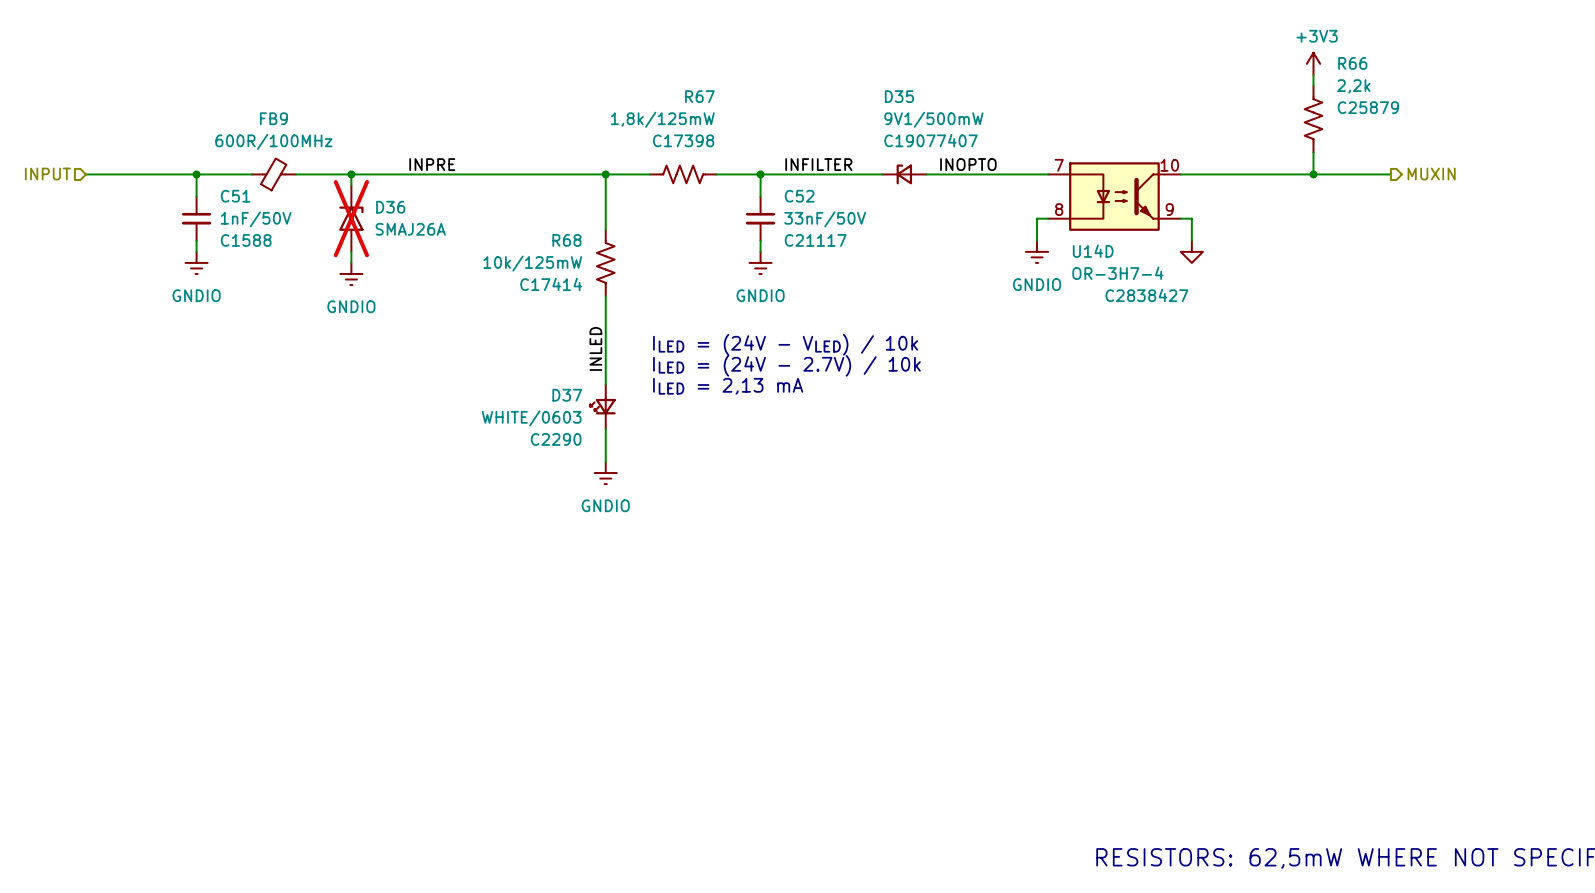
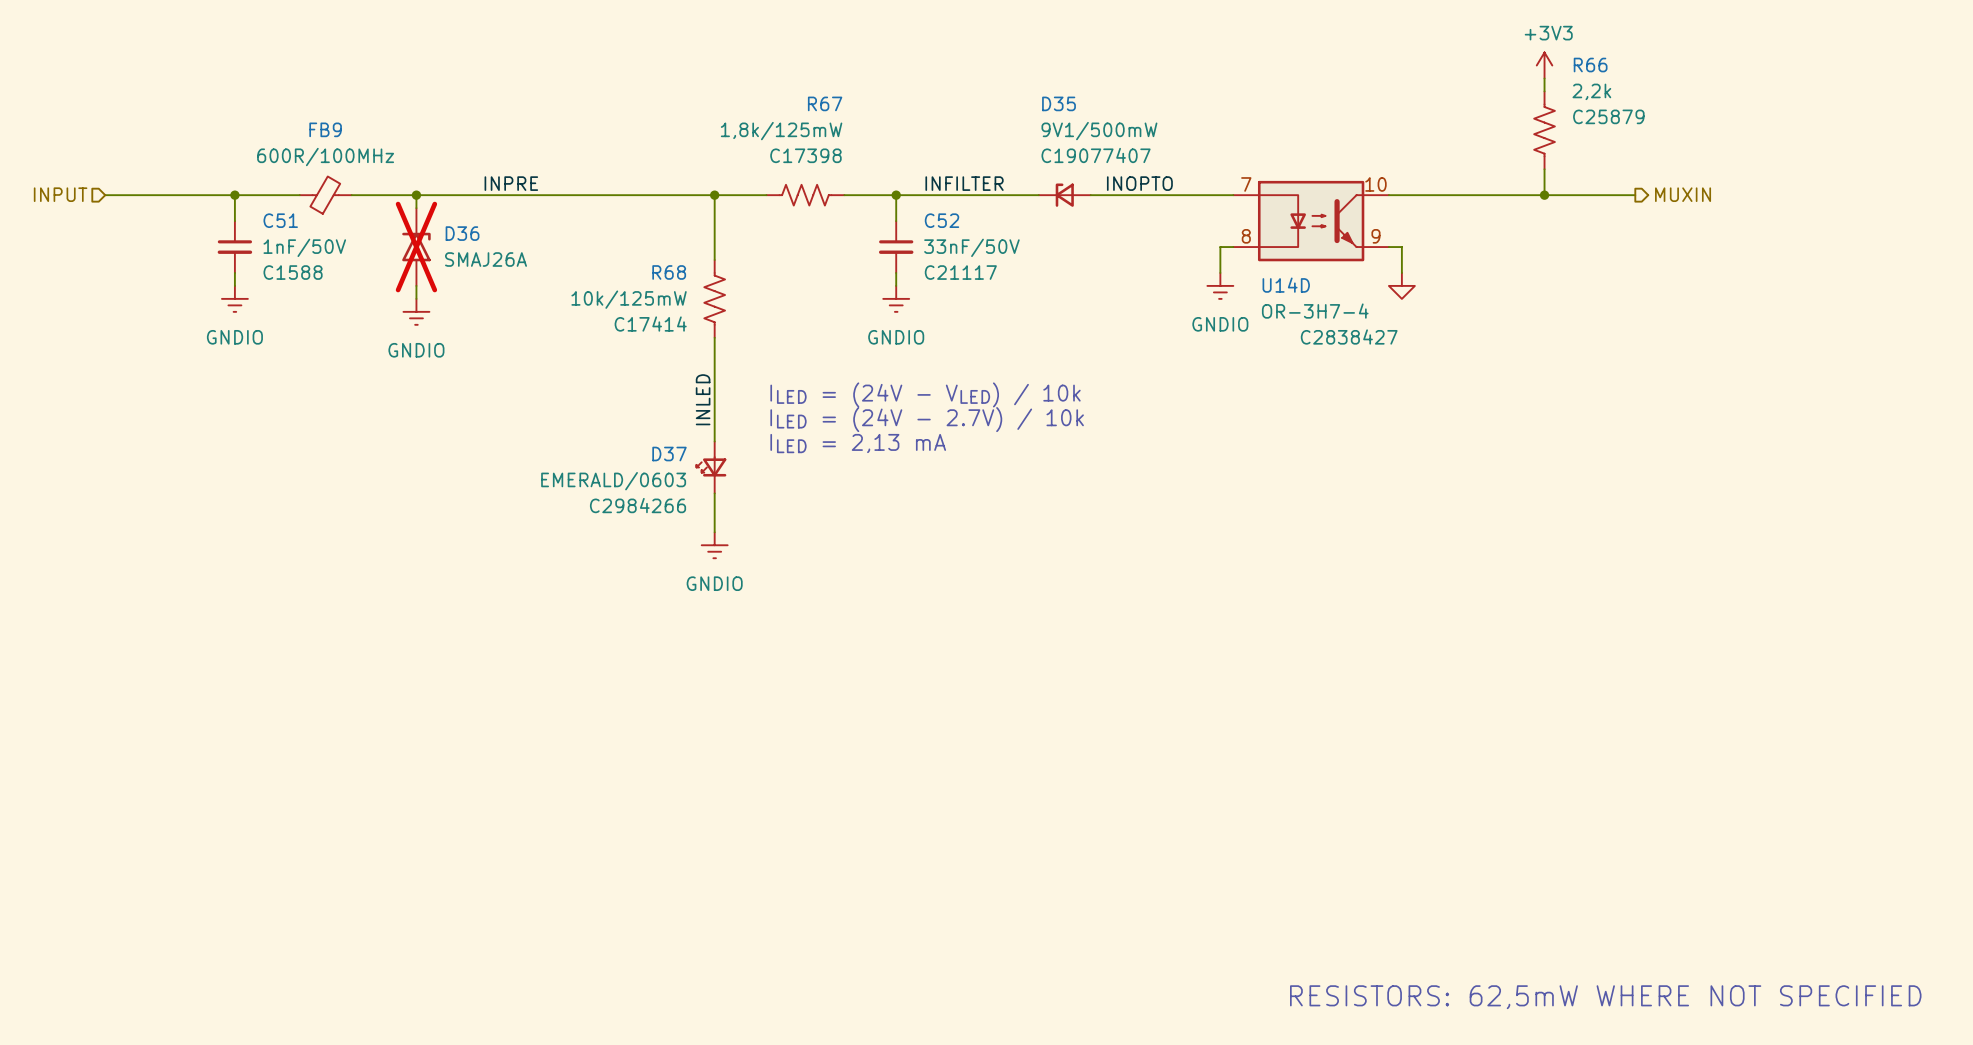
D37 value: WHITE/0603 (531, 418) -> EMERALD/0603 (613, 481)
D37 text: C2290 (556, 439) -> C2984266 (638, 505)

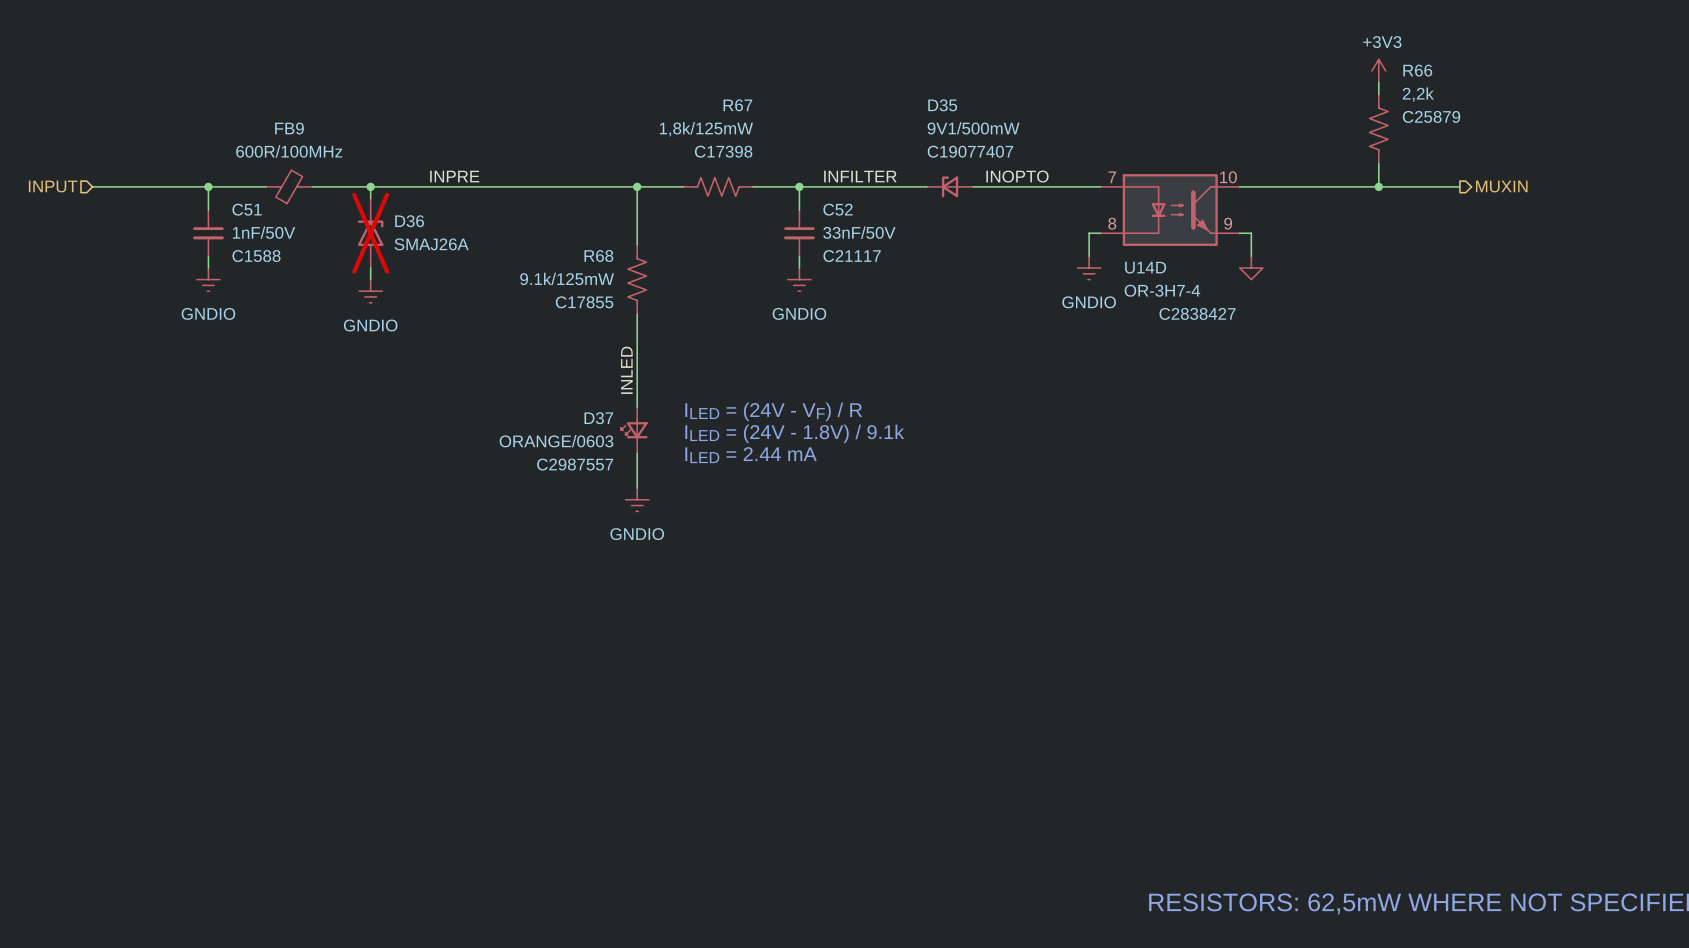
R68 value: 10k/125mW (629, 299) -> 9.1k/125mW (567, 278)
R68 text: C17414 (650, 324) -> C17855 (584, 302)
text: ILED = (24V - VLED) / 10k (925, 394) -> none
text: ILED = (24V - 2.7V) / 10k (927, 419) -> none
text: ILED = 2,13 mA (858, 443) -> ILED = (24V - VF) / R (773, 411)
text: none -> ILED = (24V - 1.8V) / 9.1k (794, 433)
D37 value: EMERALD/0603 (613, 481) -> ORANGE/0603 (556, 441)
text: none -> ILED = 2.44 mA (751, 455)
D37 text: C2984266 (638, 505) -> C2987557 (575, 464)

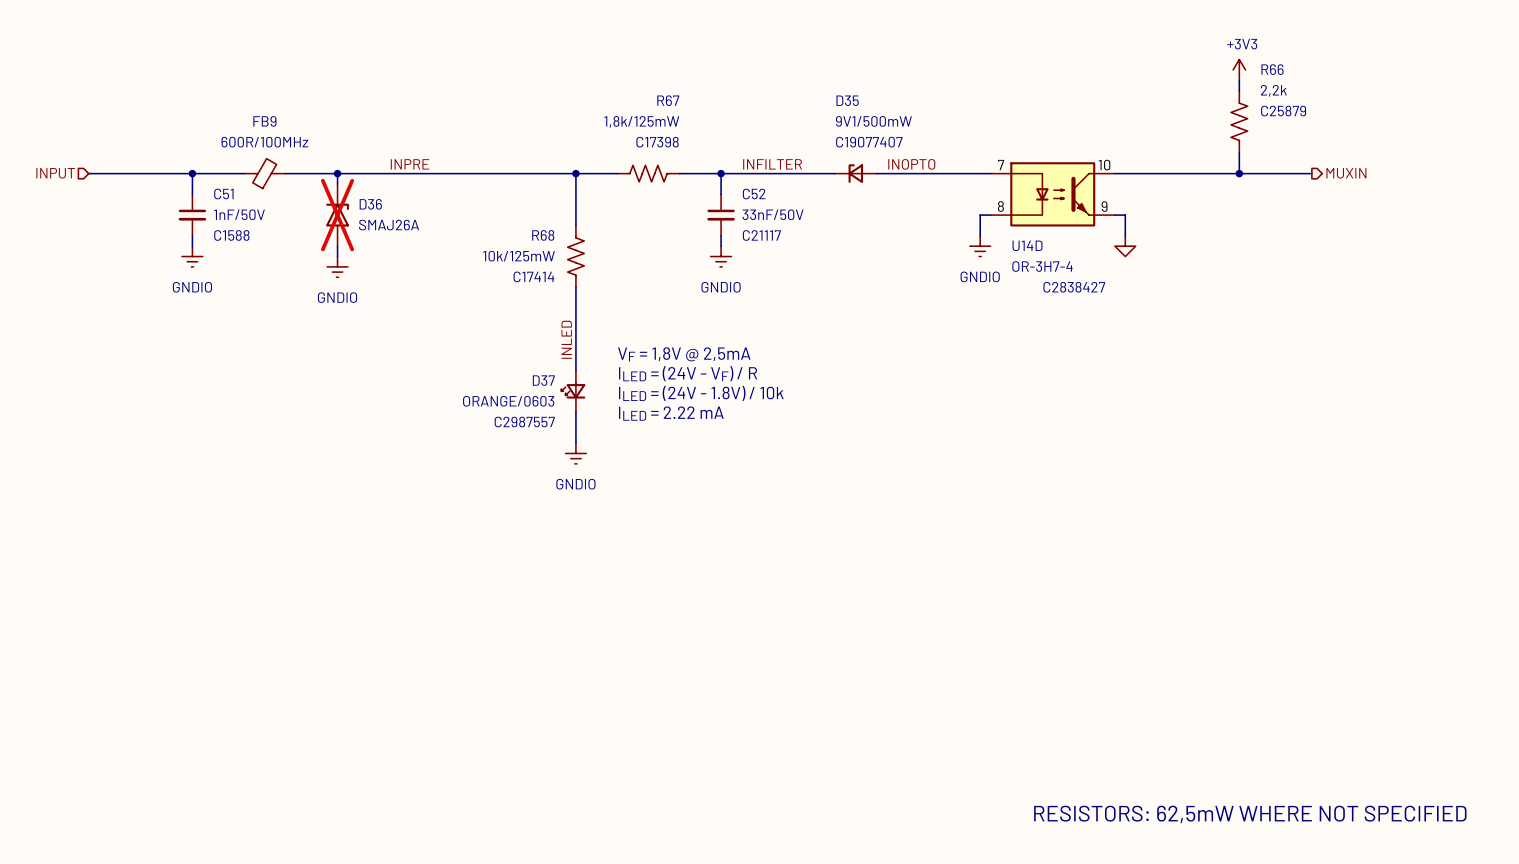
R68 value: 9.1k/125mW (567, 278) -> 10k/125mW (519, 256)
R68 text: C17855 (584, 302) -> C17414 (533, 276)
text: none -> VF = 1,8V @ 2,5mA (684, 354)
text: ILED = (24V - 1.8V) / 9.1k (794, 433) -> ILED = (24V - 1.8V) / 10k (701, 393)
text: ILED = 2.44 mA (751, 455) -> ILED = 2.22 mA (671, 413)

